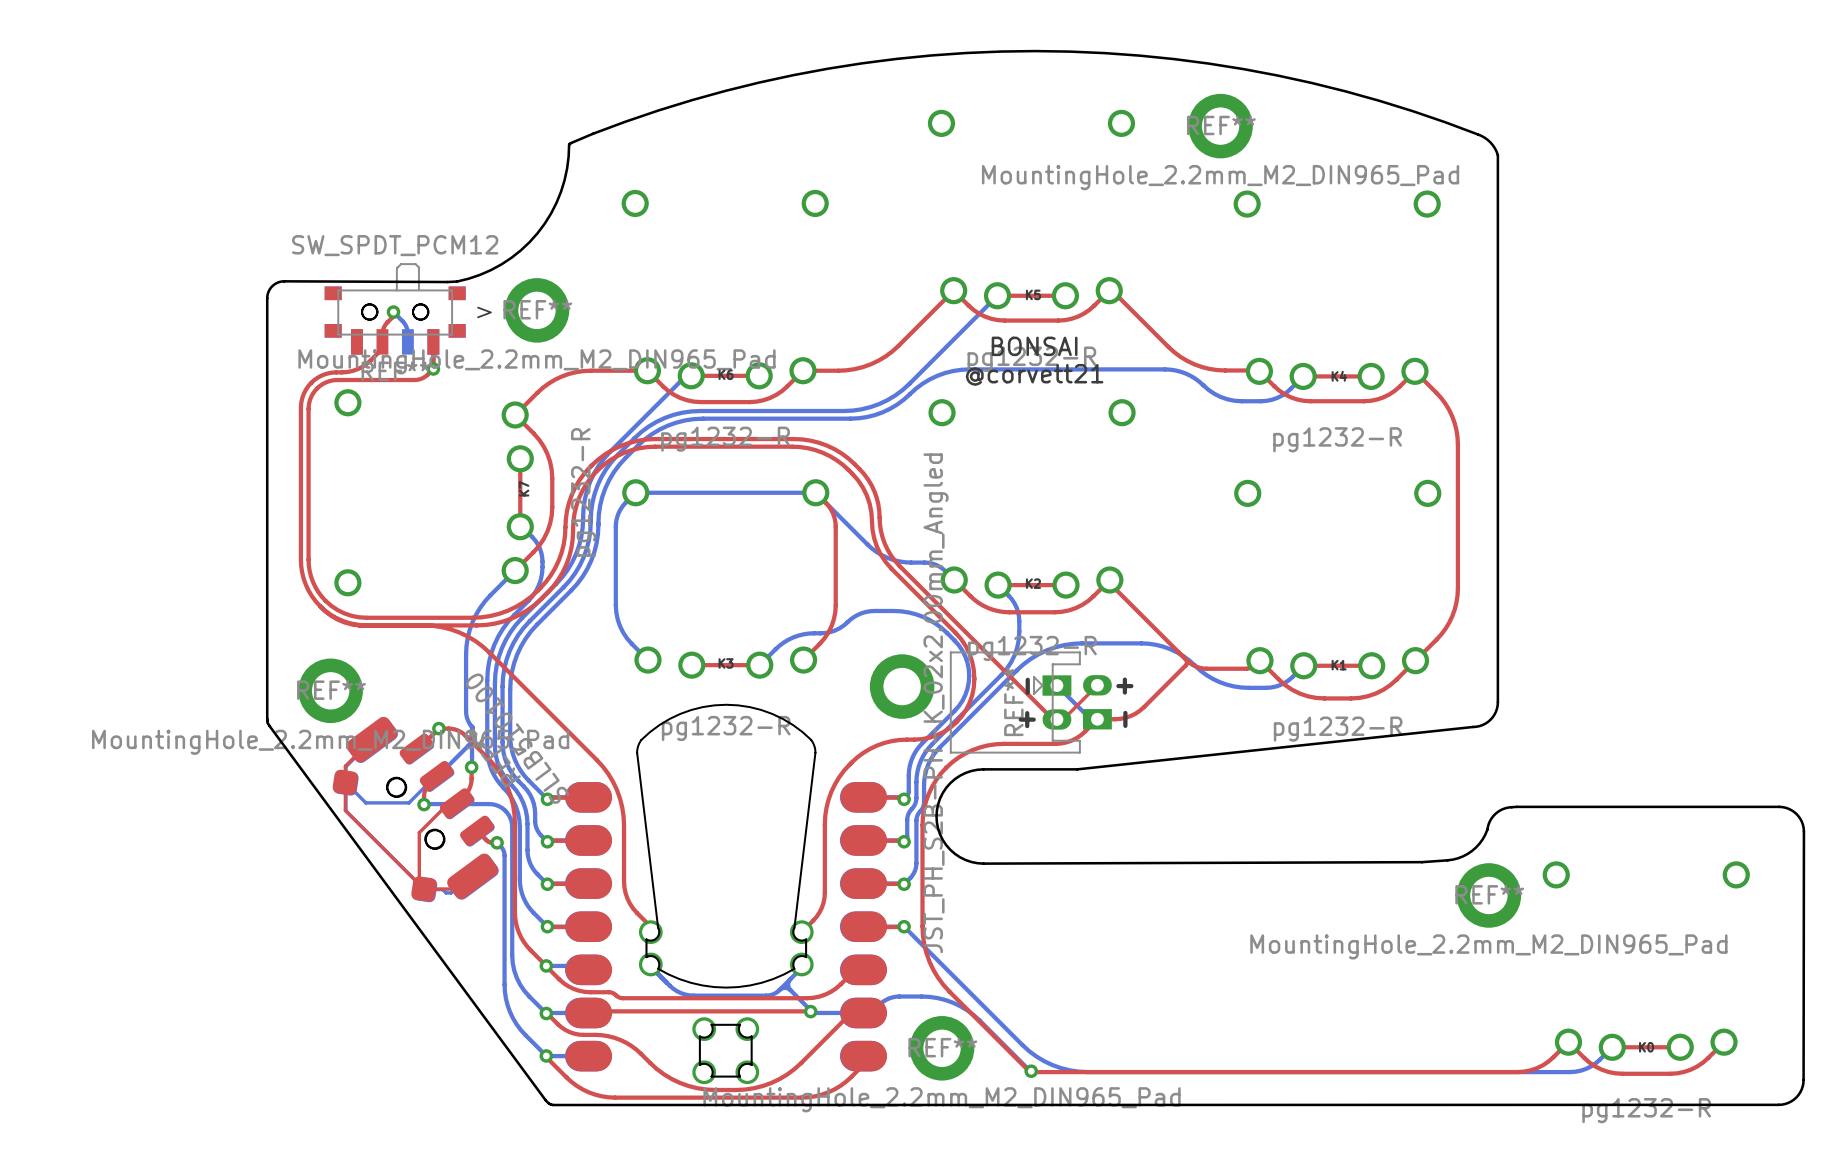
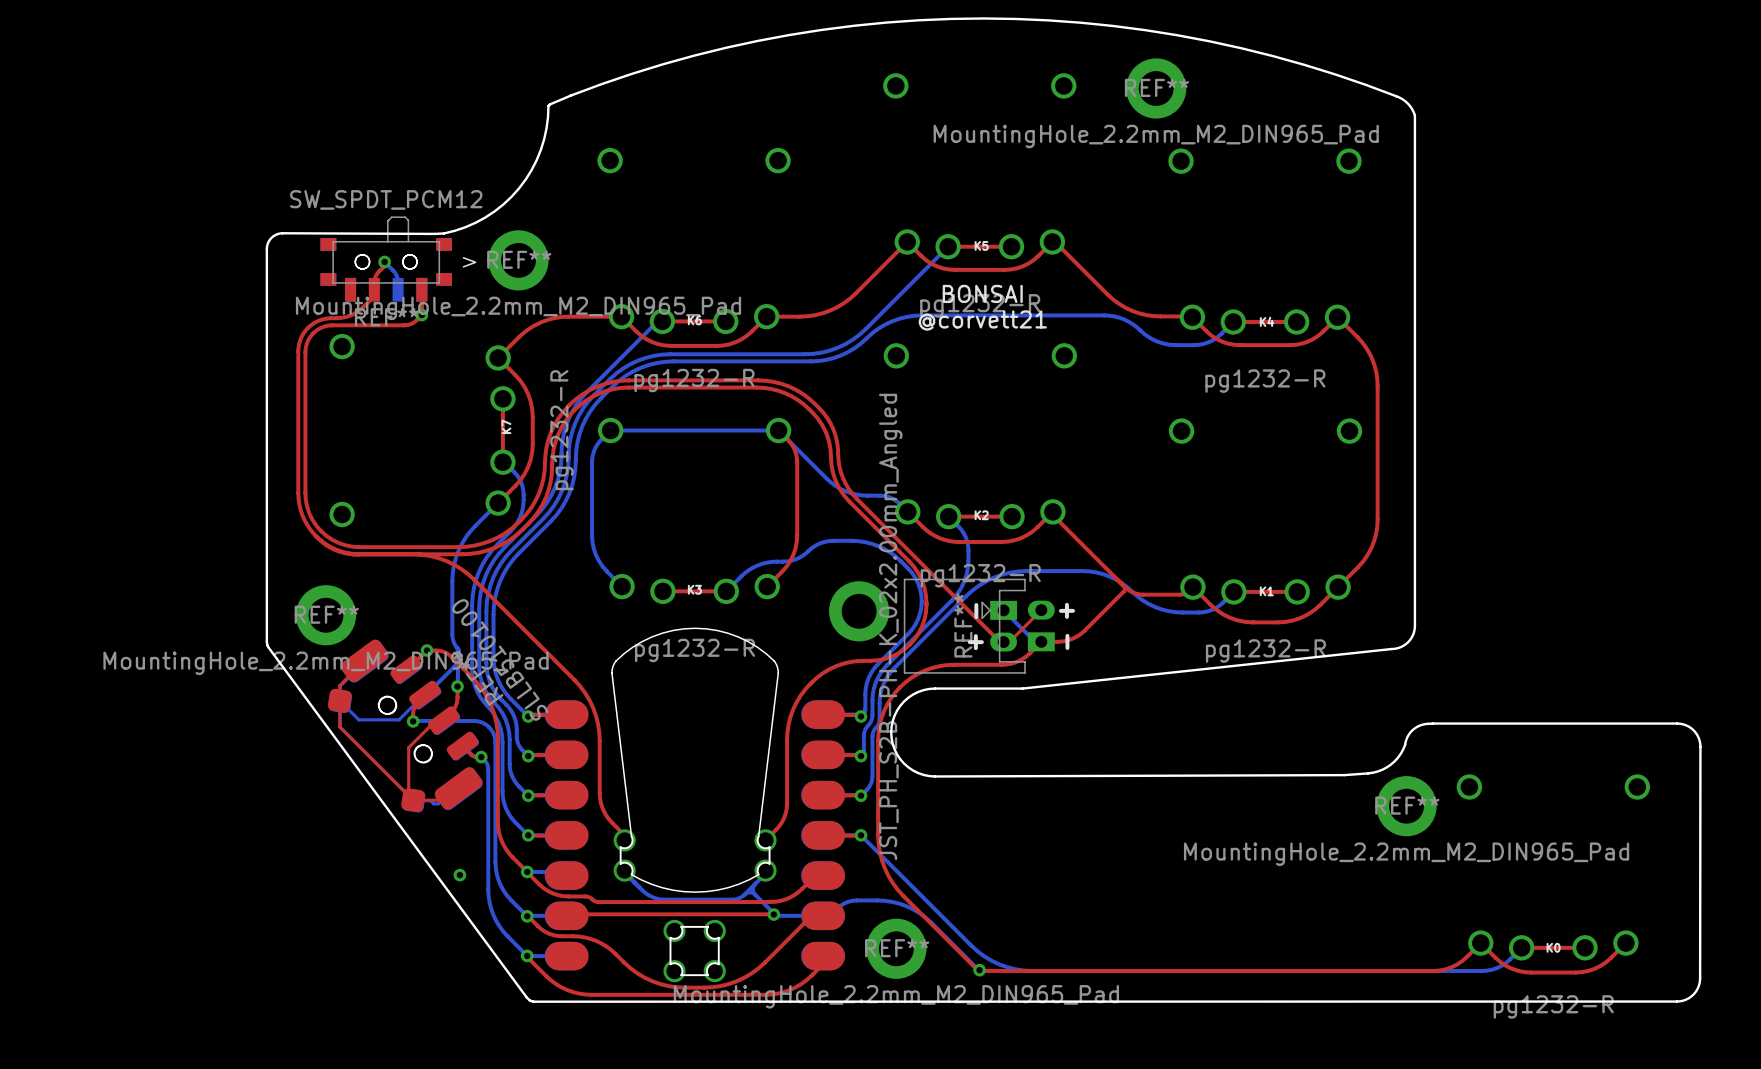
via: none -> (459, 875)

